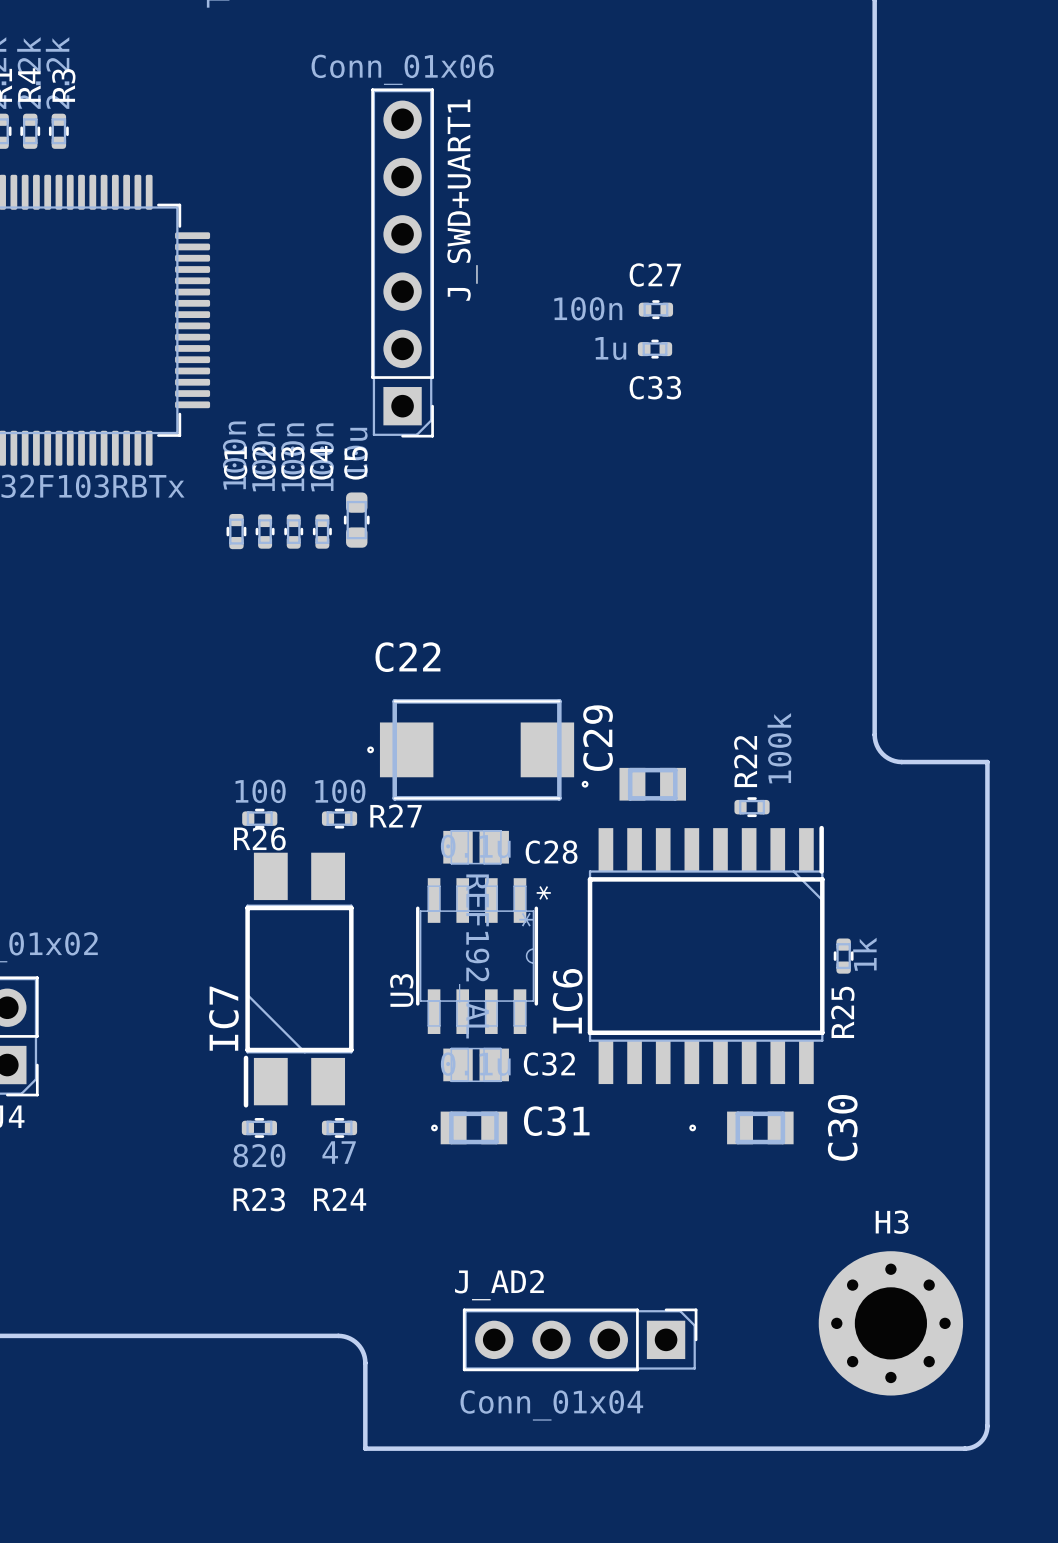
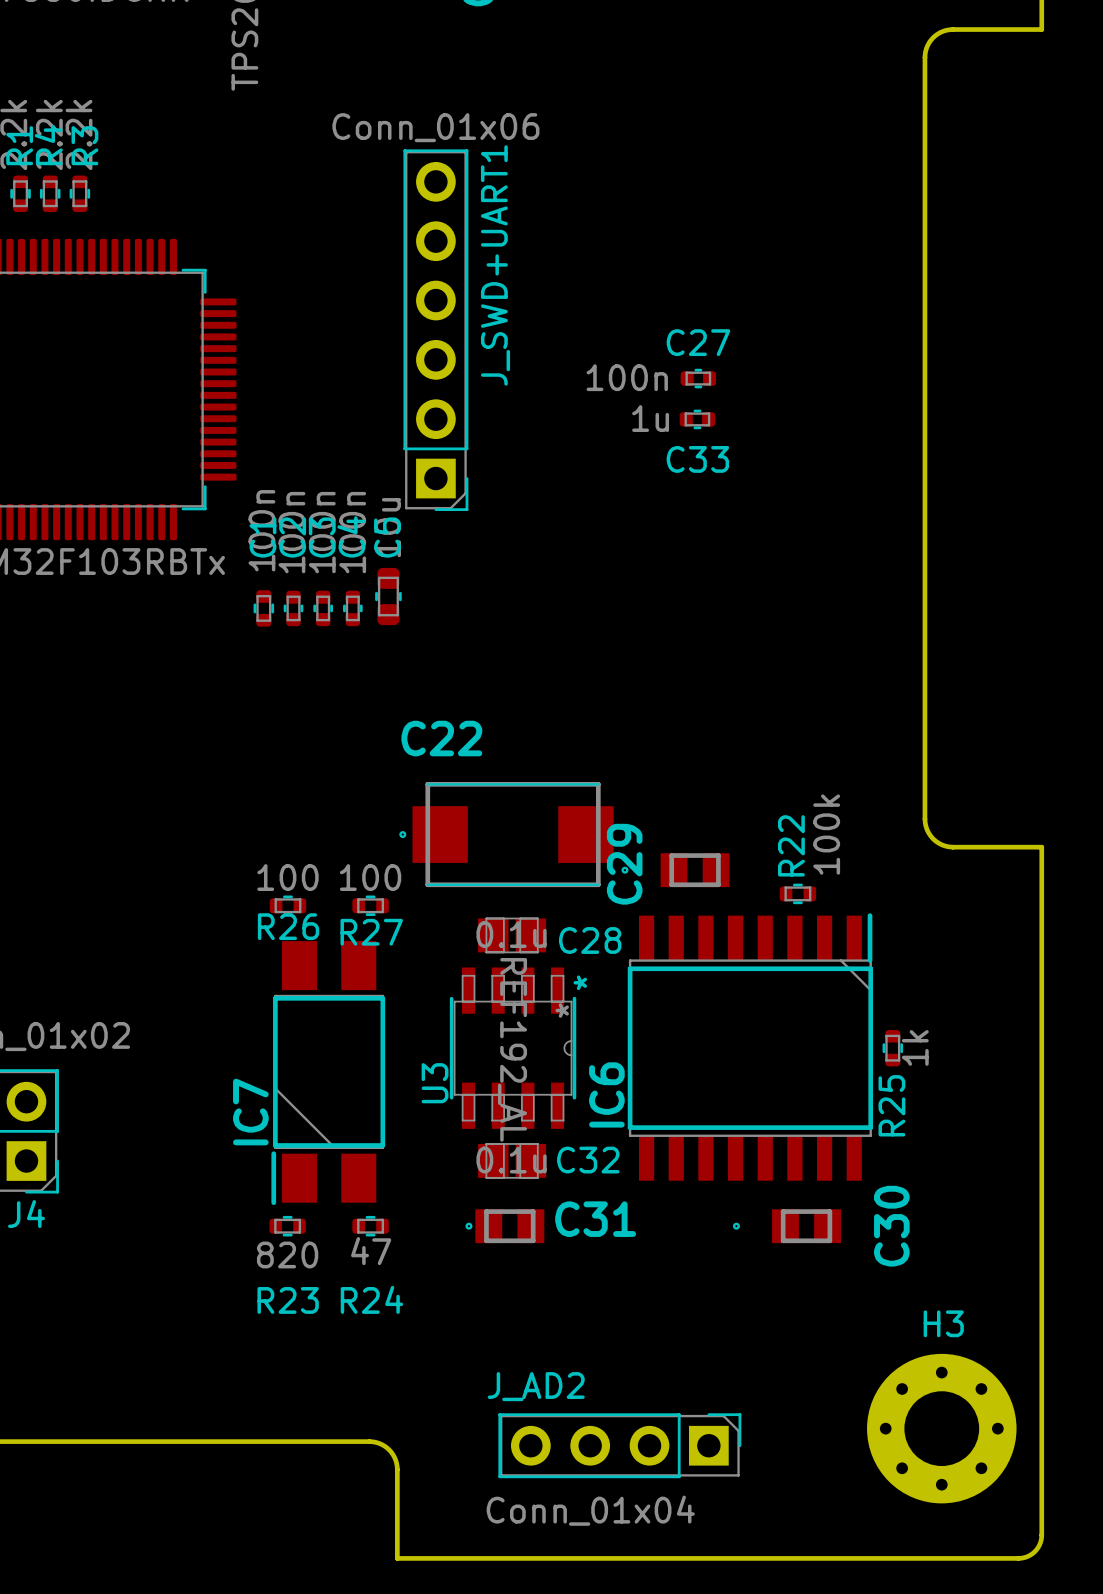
C29 name position: C29 (598, 738) -> C29 (624, 864)
R27 name position: R27 (396, 816) -> R27 (371, 932)

